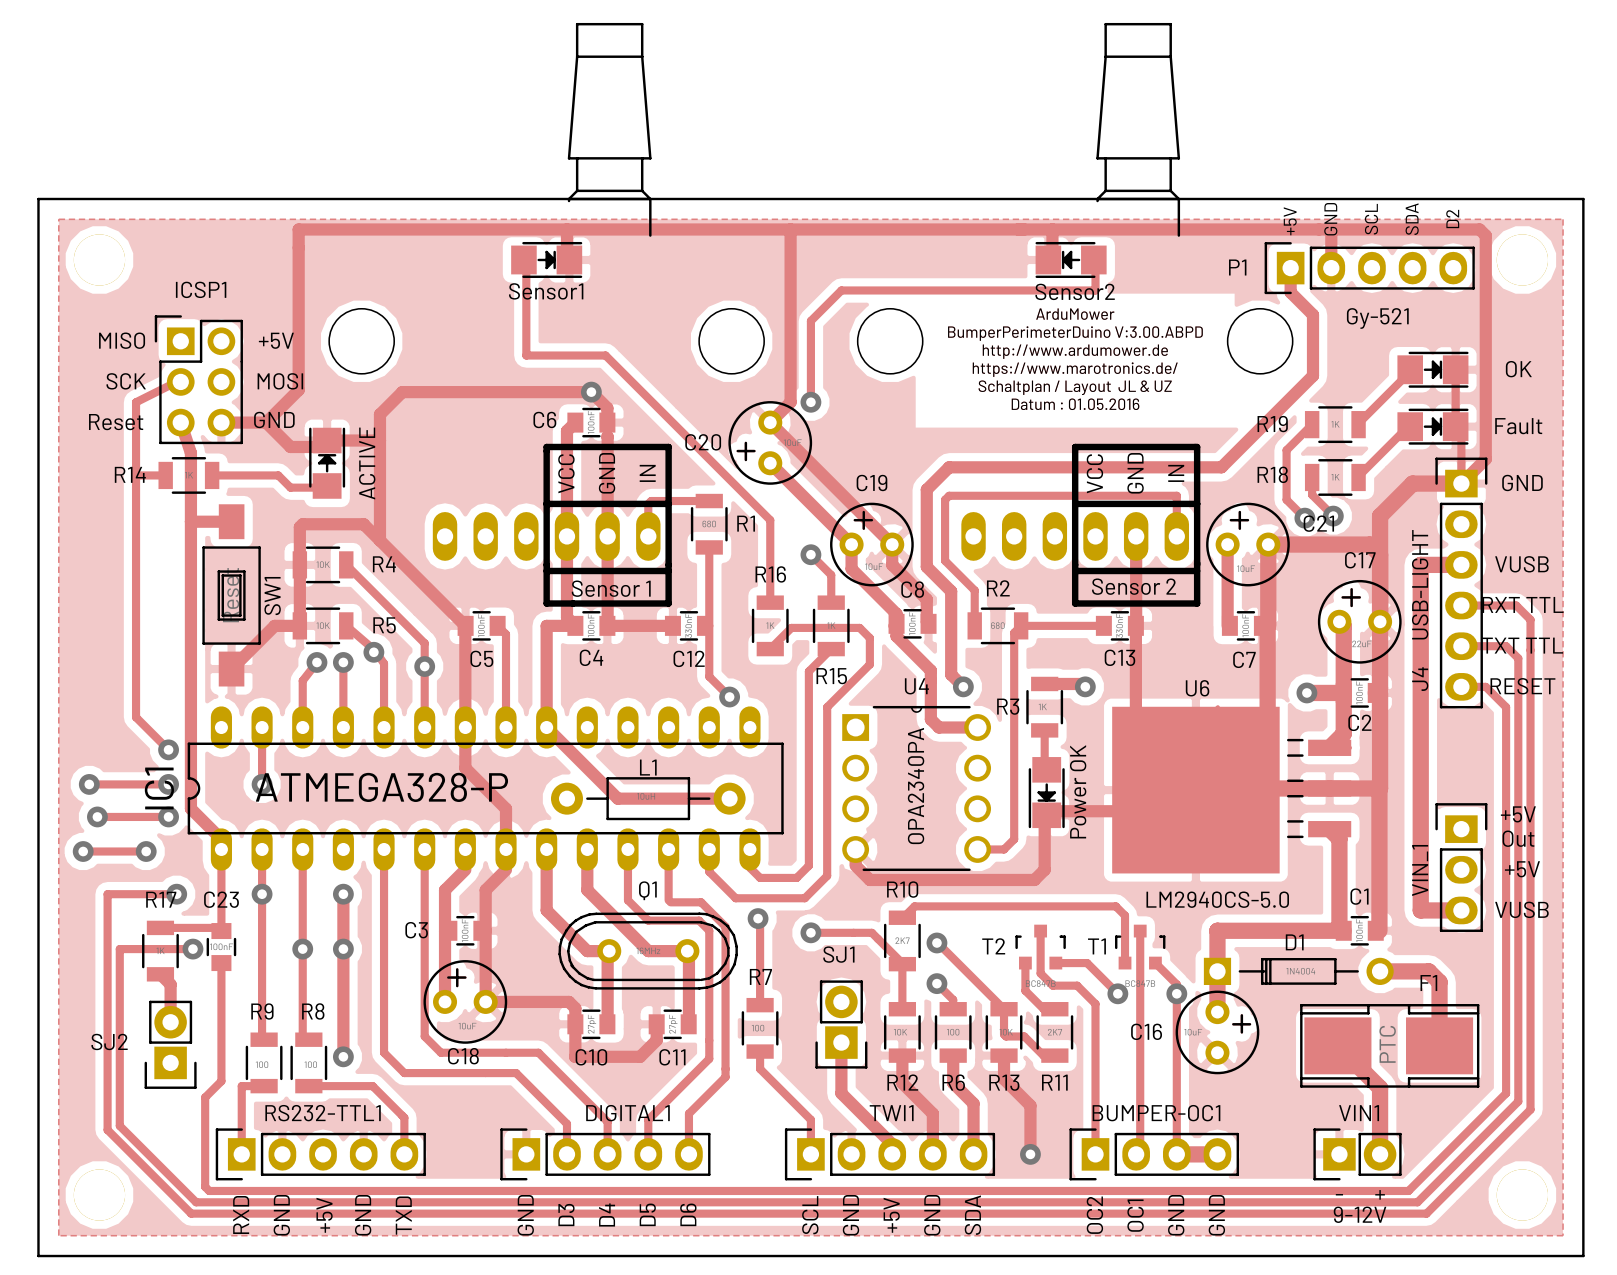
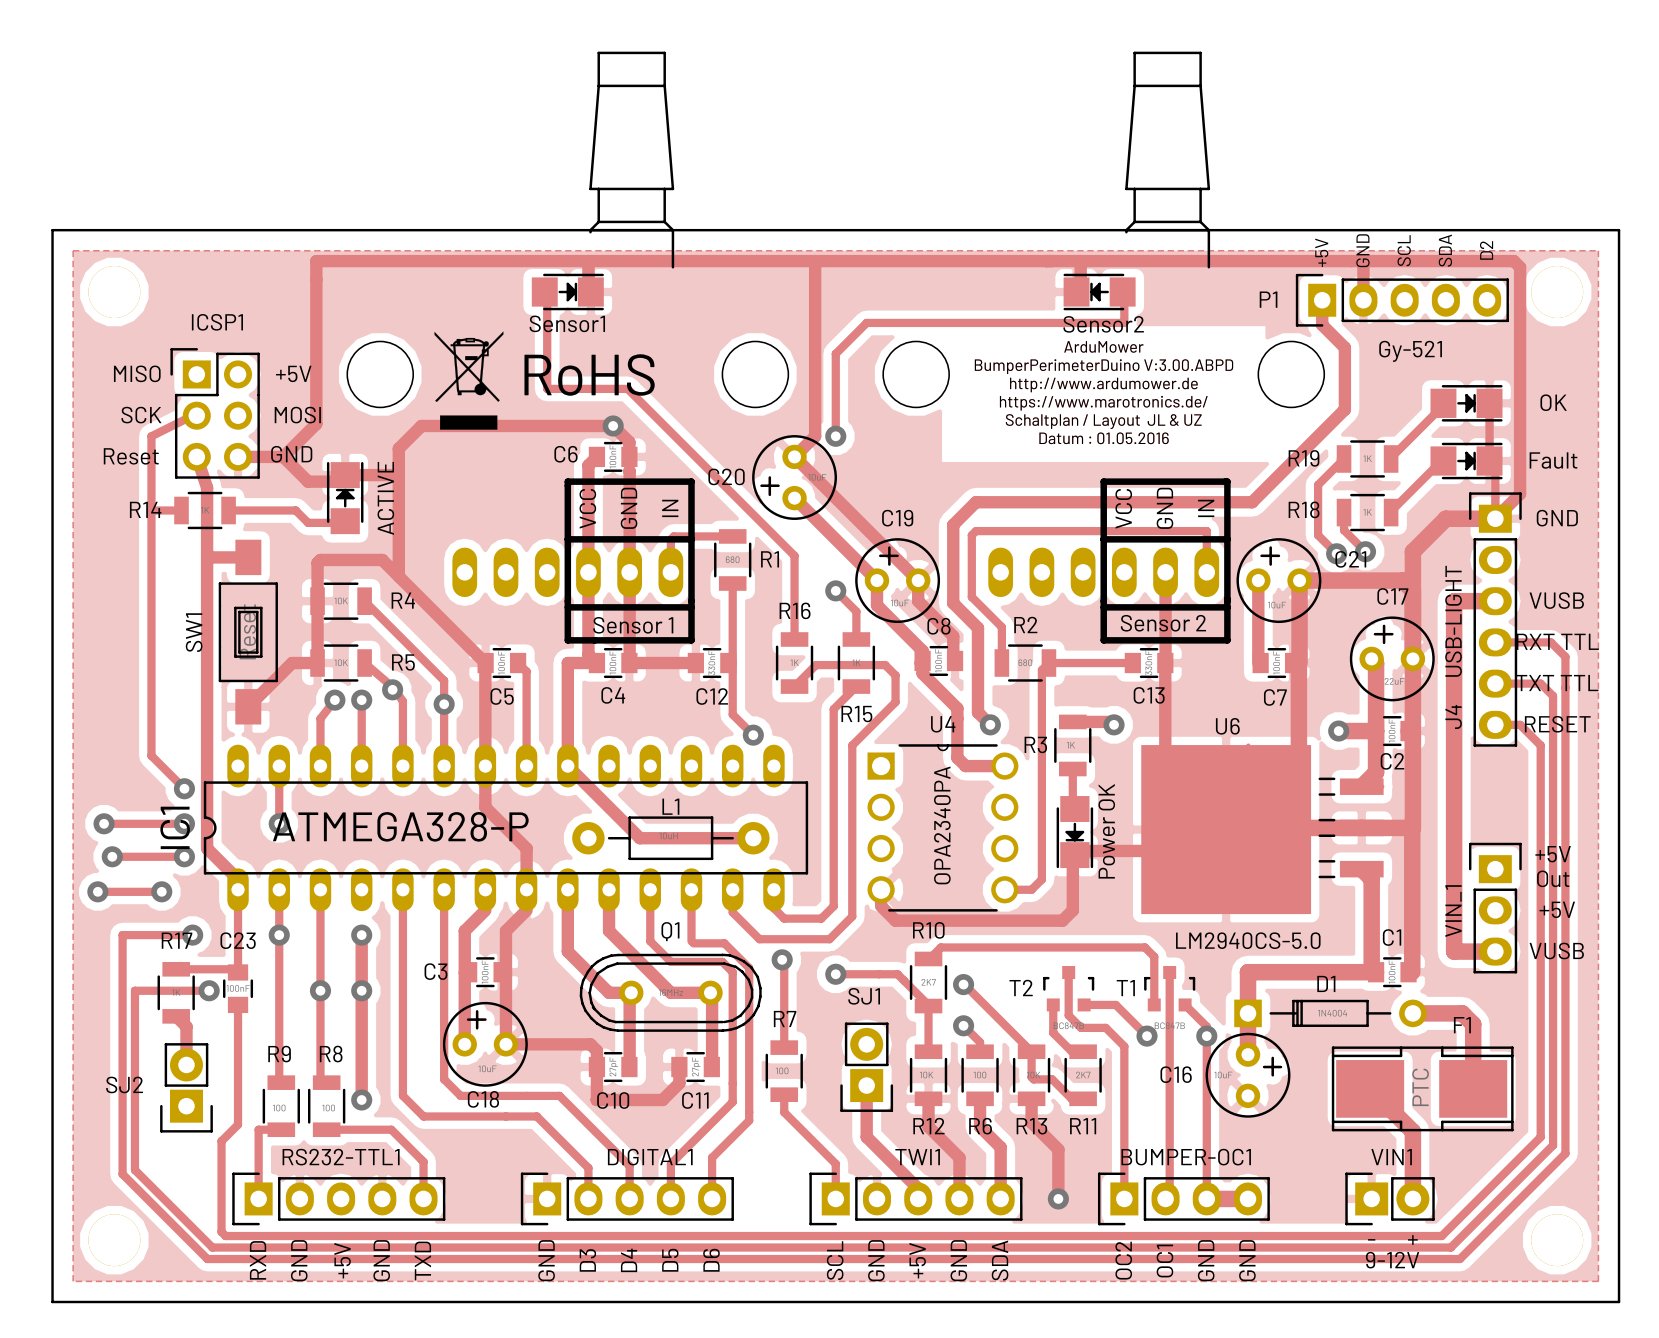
drawing: none -> [434, 331, 504, 430]
text: none -> RoHS (589, 375)
SW1 name position: SW1 (272, 596) -> SW1 (194, 632)

